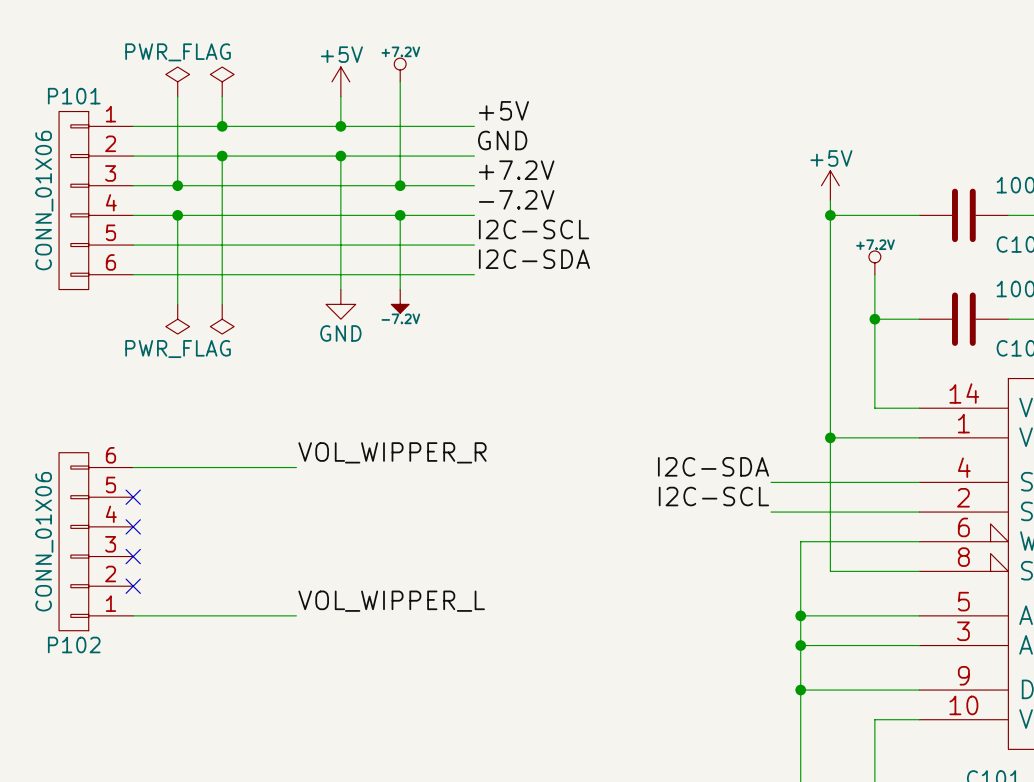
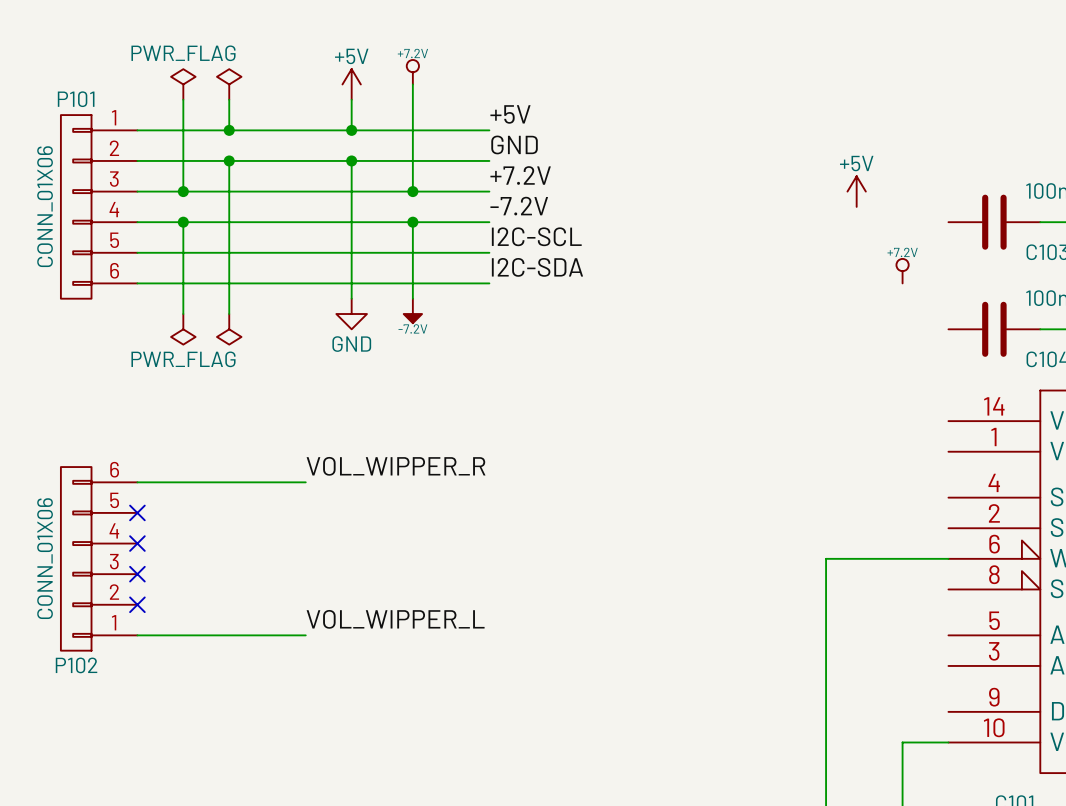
wire: (830, 200) (830, 571) (919, 571) -> none
wire: (830, 215) (919, 215) -> none
junction: (830, 215) -> none
wire: (874, 274) (874, 408) (919, 408) -> none
wire: (874, 319) (919, 319) -> none
junction: (874, 319) -> none
wire: (830, 437) (919, 437) -> none
junction: (830, 437) -> none
label: I2C-SDA (713, 466) -> none
wire: (771, 482) (919, 482) -> none
label: I2C-SCL (713, 496) -> none
wire: (771, 512) (919, 512) -> none
wire: (800, 615) (919, 615) -> none
junction: (800, 615) -> none
wire: (800, 645) (919, 645) -> none
junction: (800, 645) -> none
wire: (800, 690) (919, 690) -> none
junction: (800, 690) -> none

